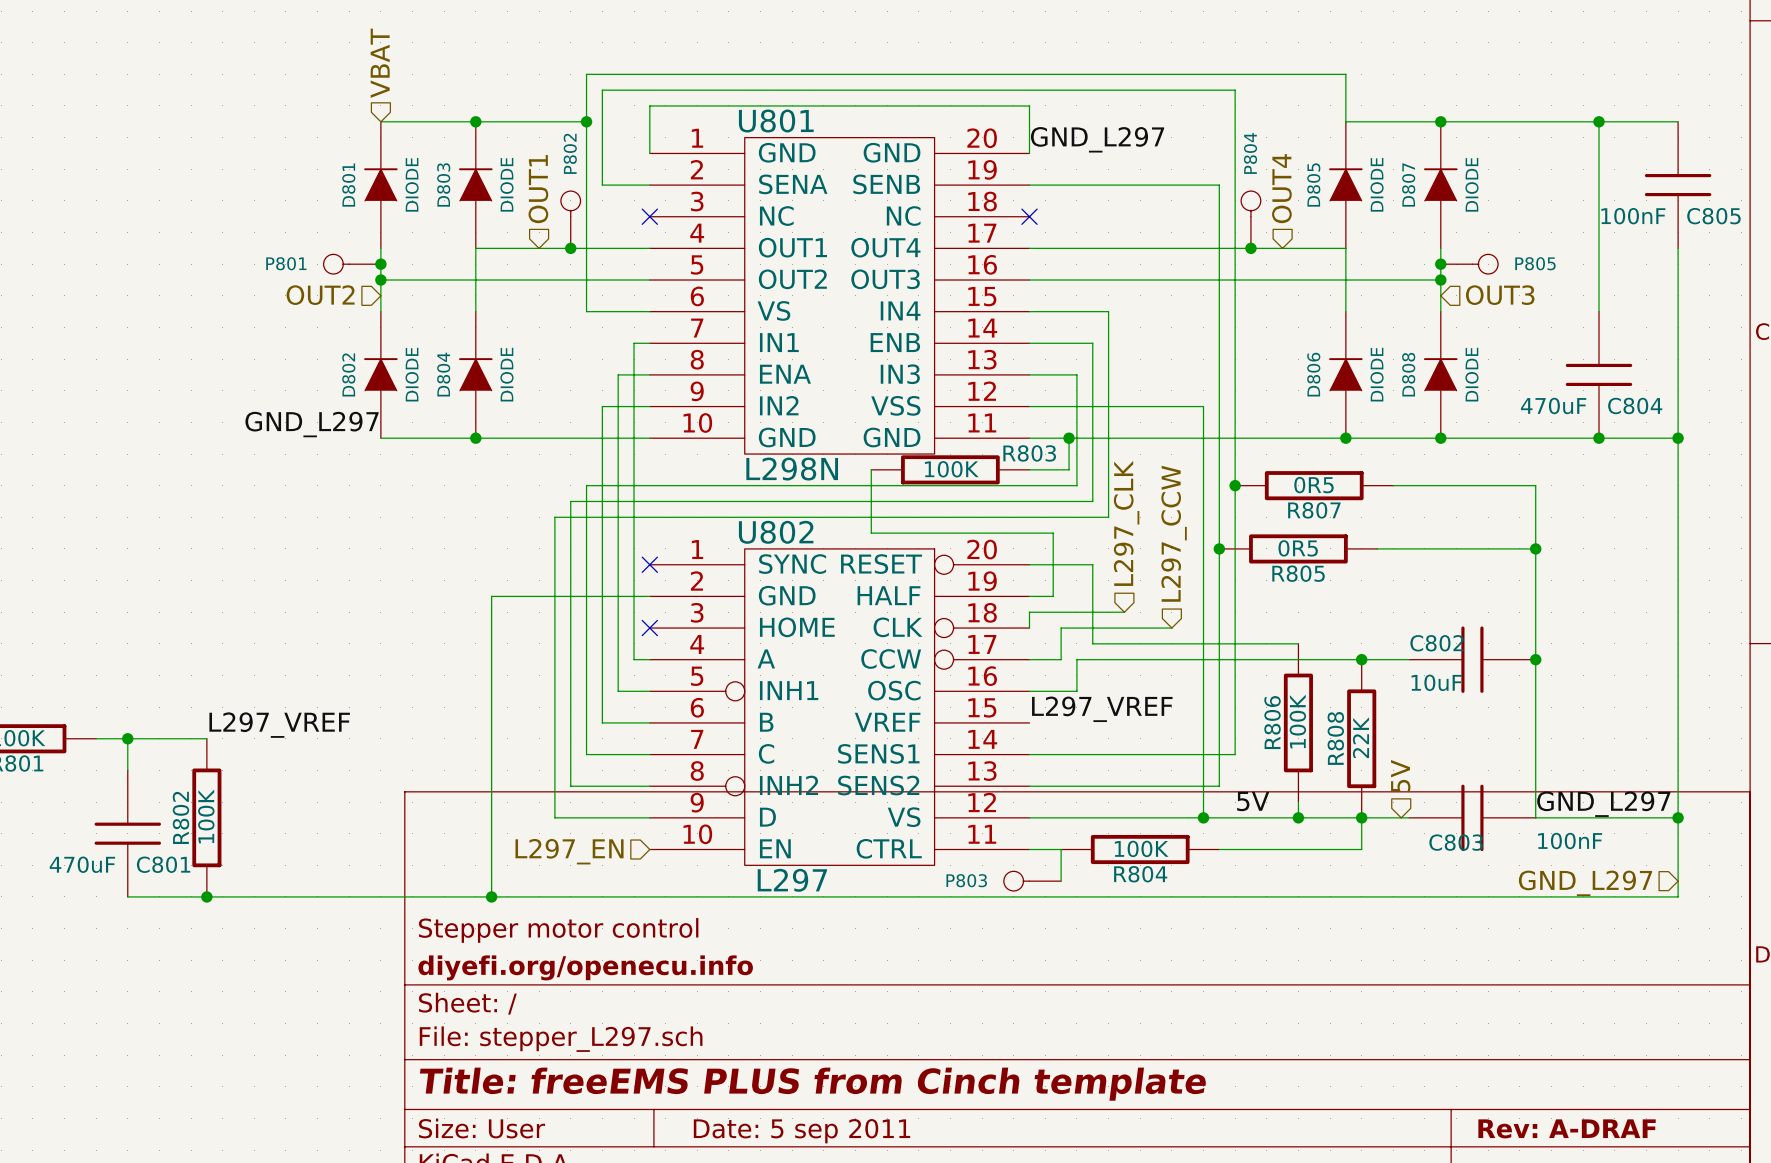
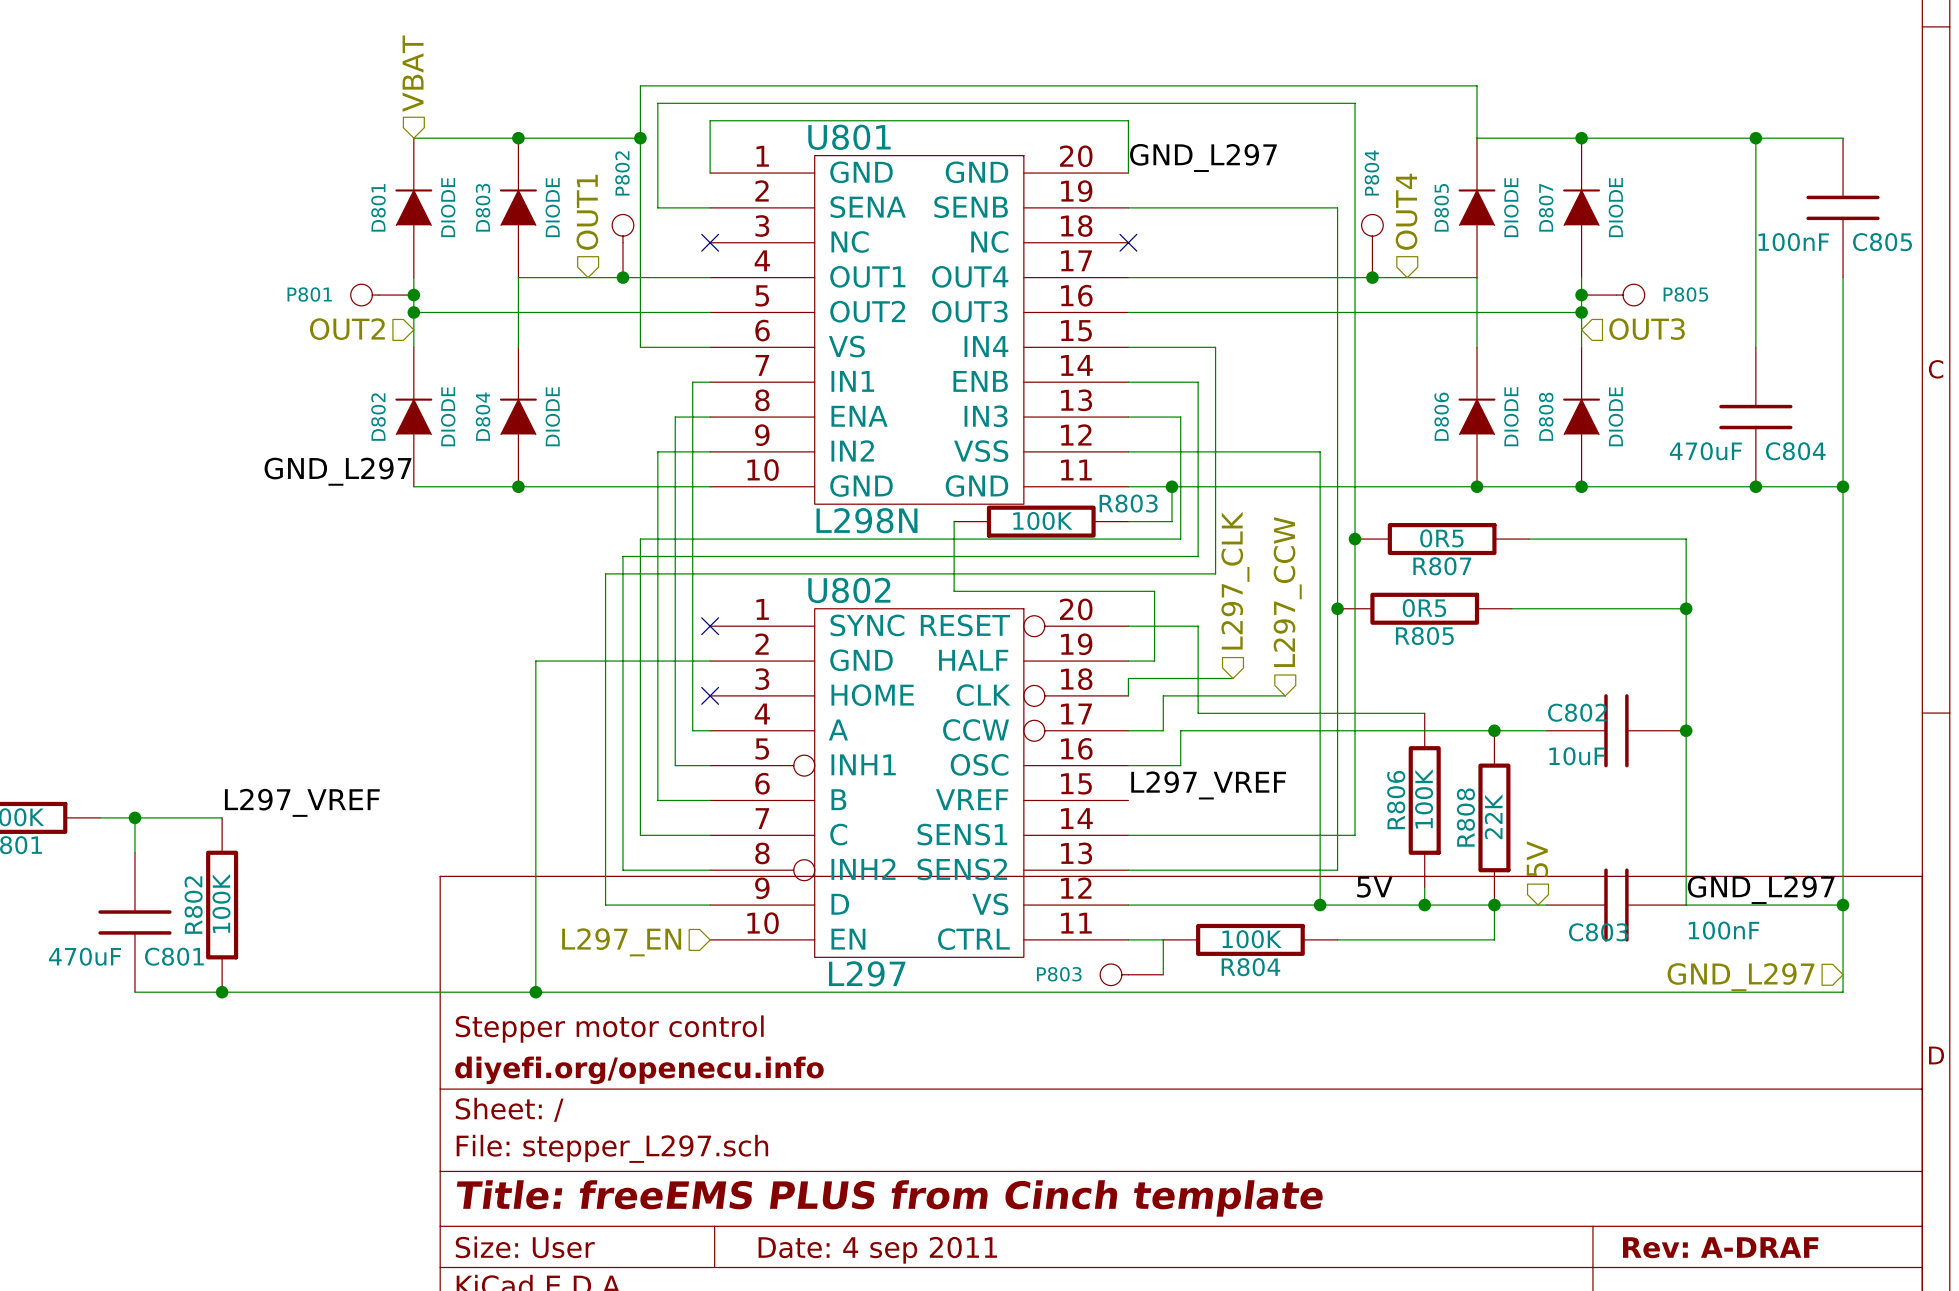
title block: Date: 5 sep 2011 (802, 1131) -> Date: 4 sep 2011 (877, 1250)

